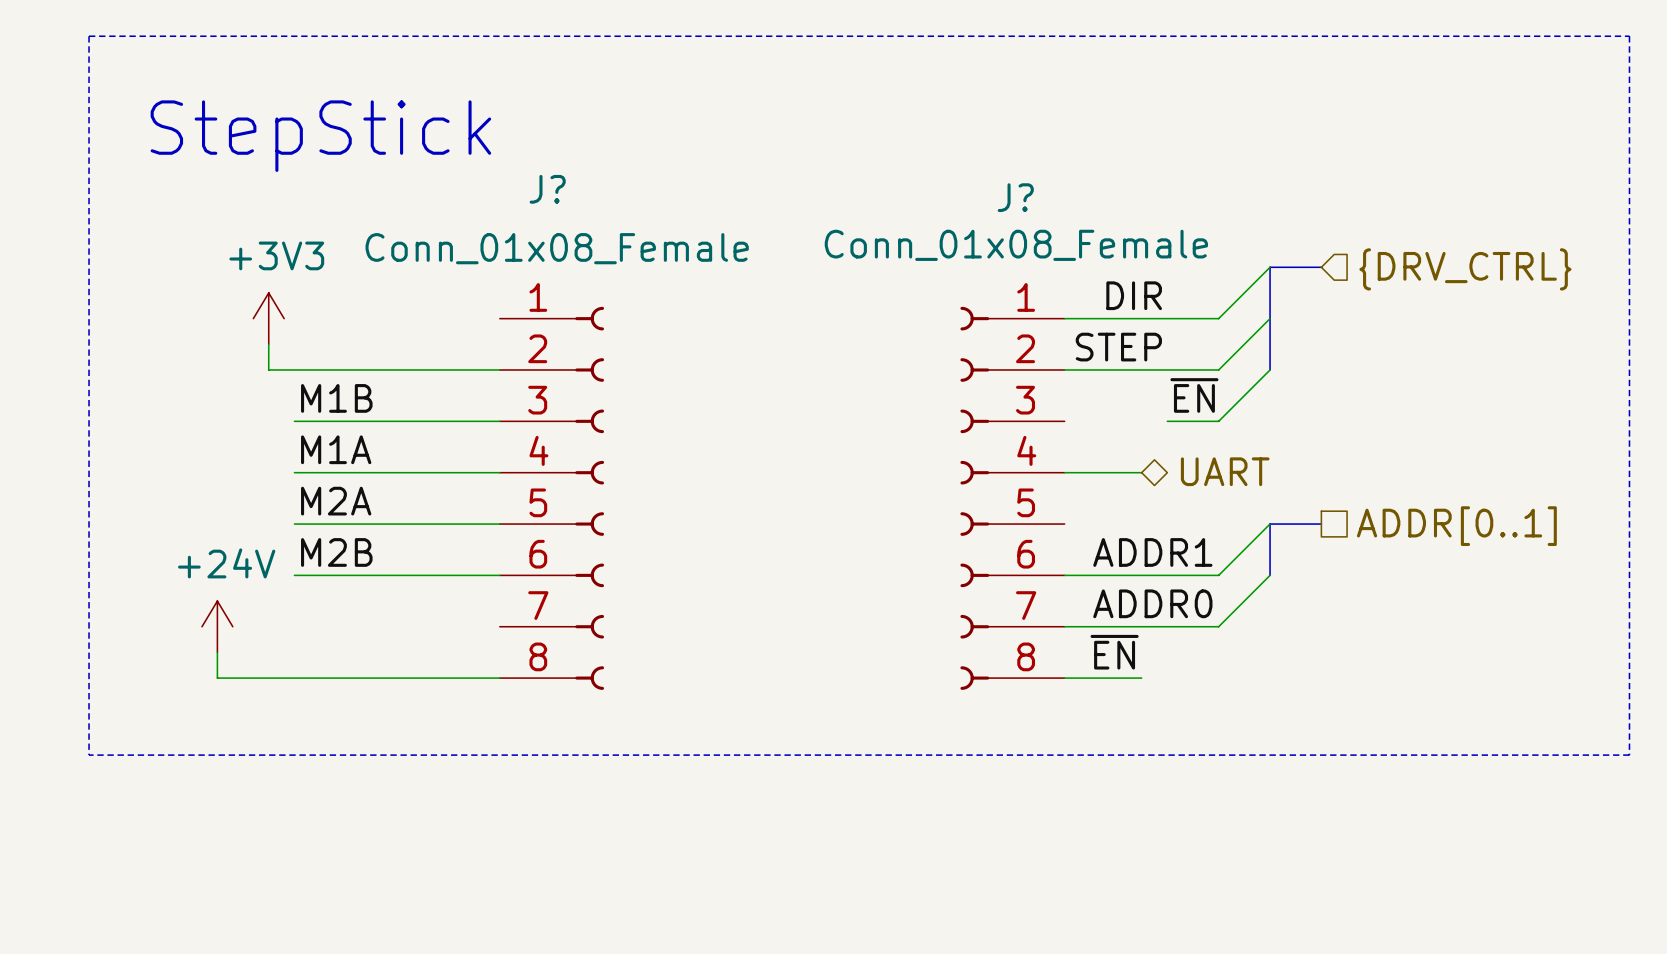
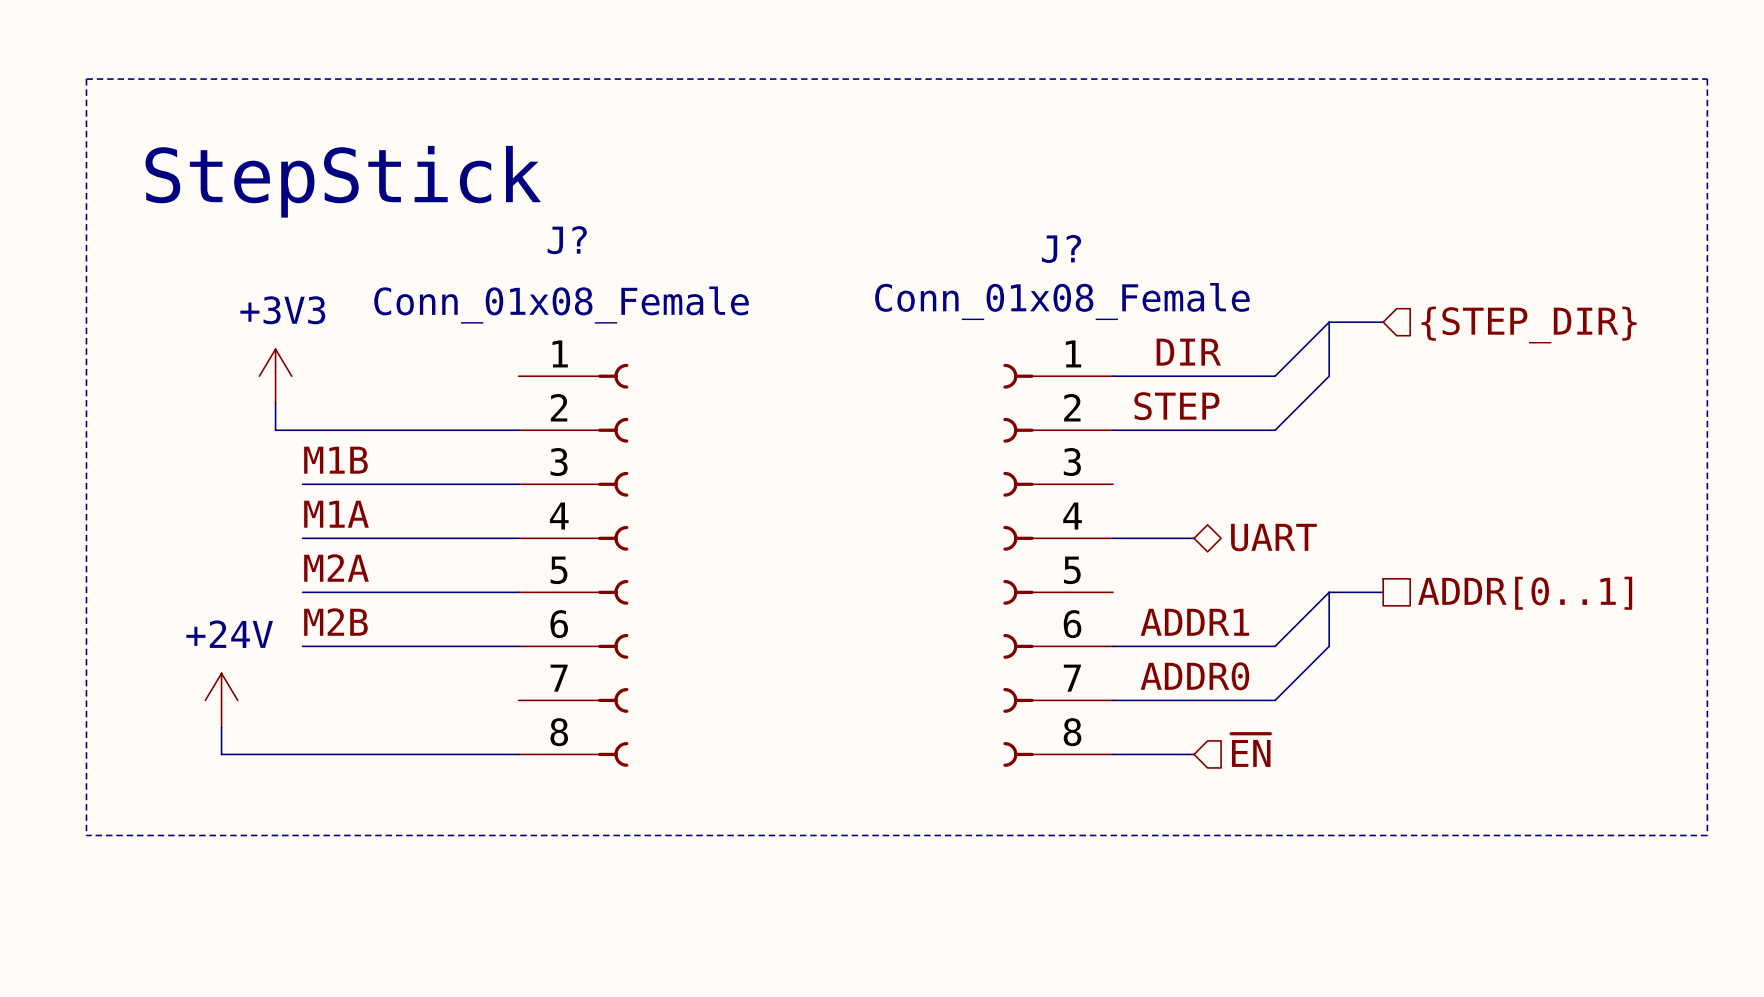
hierarchical label: {DRV_CTRL} (1465, 269) -> {STEP_DIR} (1529, 324)
bus: (1270, 318) (1270, 369) -> none
wire: (1270, 369) (1218, 421) (1167, 421) -> none
label: ~{EN} (1194, 395) -> none
label: ~{EN} (1114, 652) -> none
hierarchical label: none -> ~{EN} (1250, 750)

